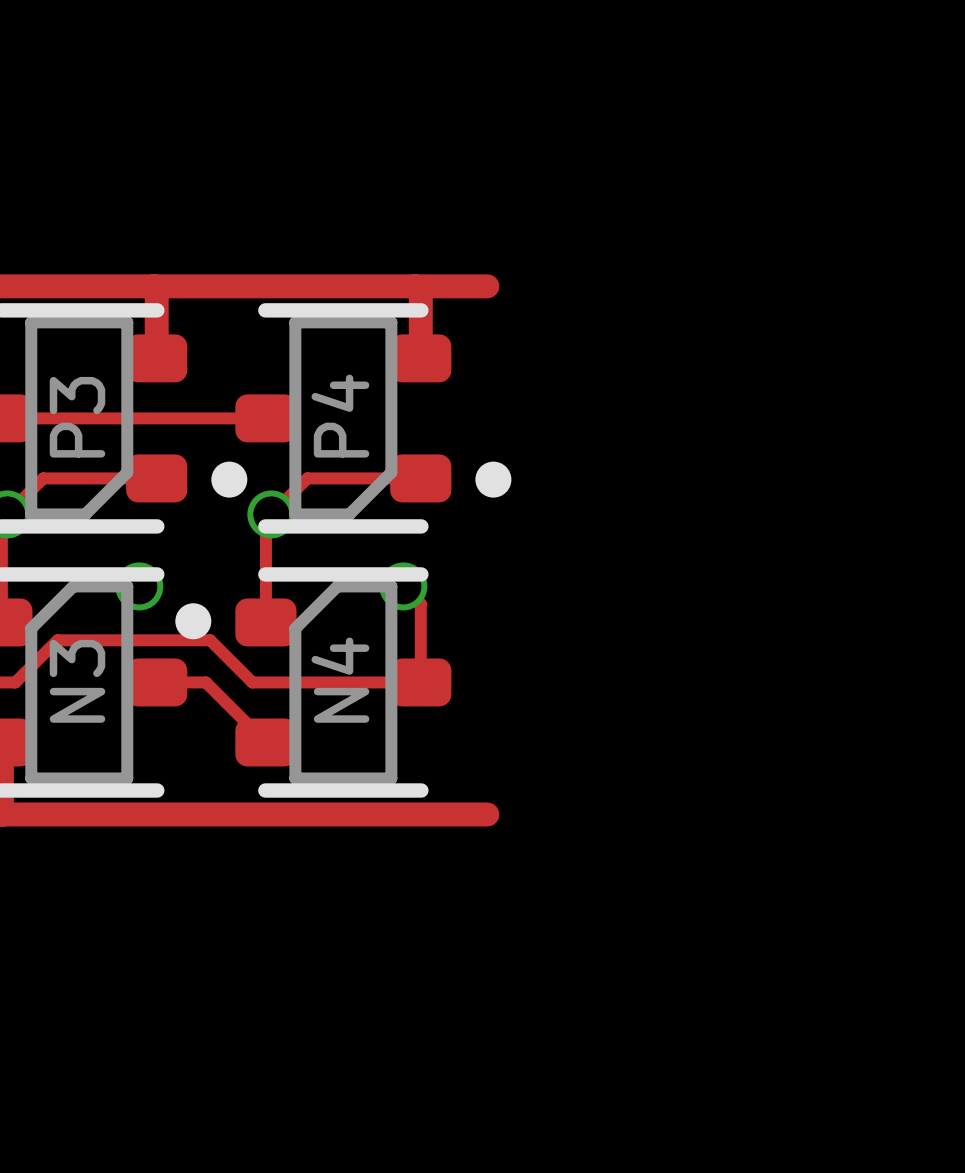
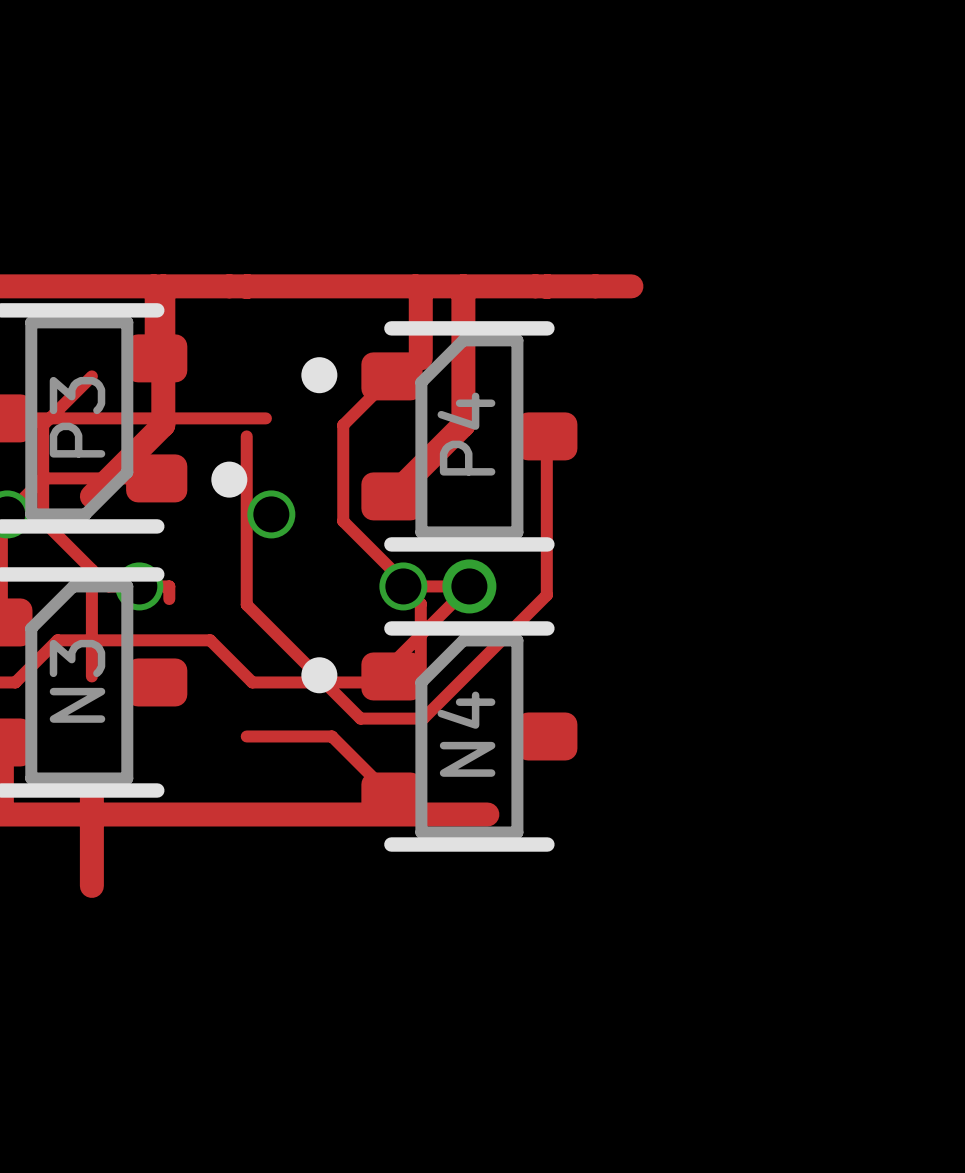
track: none -> (163, 286) (163, 424) (91, 496)
track: none -> (463, 286) (463, 424) (391, 496)
track: none -> (487, 286) (631, 286)
track: none -> (91, 376) (43, 425) (43, 520) (108, 586) (169, 586) (169, 599)
track: none -> (391, 376) (343, 425) (343, 521) (408, 586) (469, 586) (391, 663) (391, 676)
P4 rotation: 0° (373, 418) -> 180° (439, 436)
track: none -> (246, 436) (246, 604) (360, 718) (423, 718) (546, 595) (546, 436)
track: (420, 478) (307, 478) (265, 519) (265, 622) -> none
track: none -> (91, 569) (91, 676)
via: none -> (469, 586)
track: (156, 682) (205, 682) (265, 742) -> none
N4 position: (313, 682) -> (439, 736)
track: none -> (246, 736) (331, 736) (391, 796)
track: none -> (91, 796) (91, 885)

